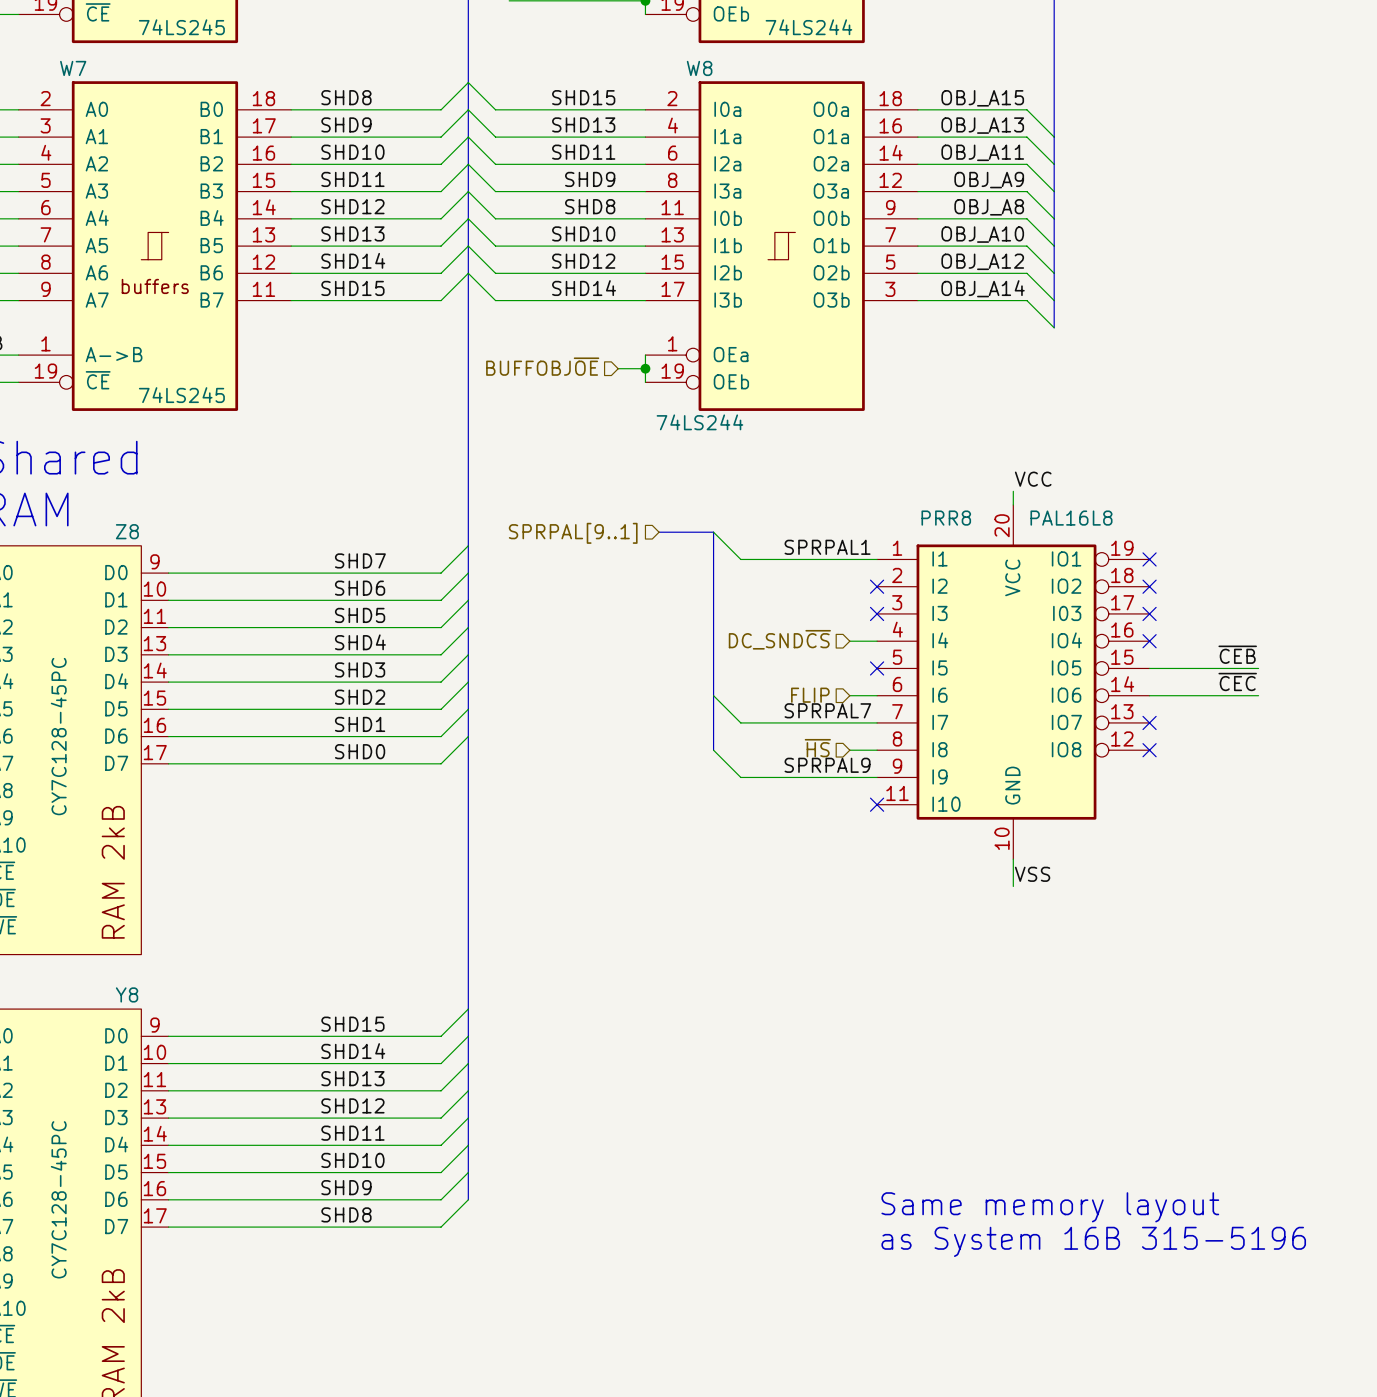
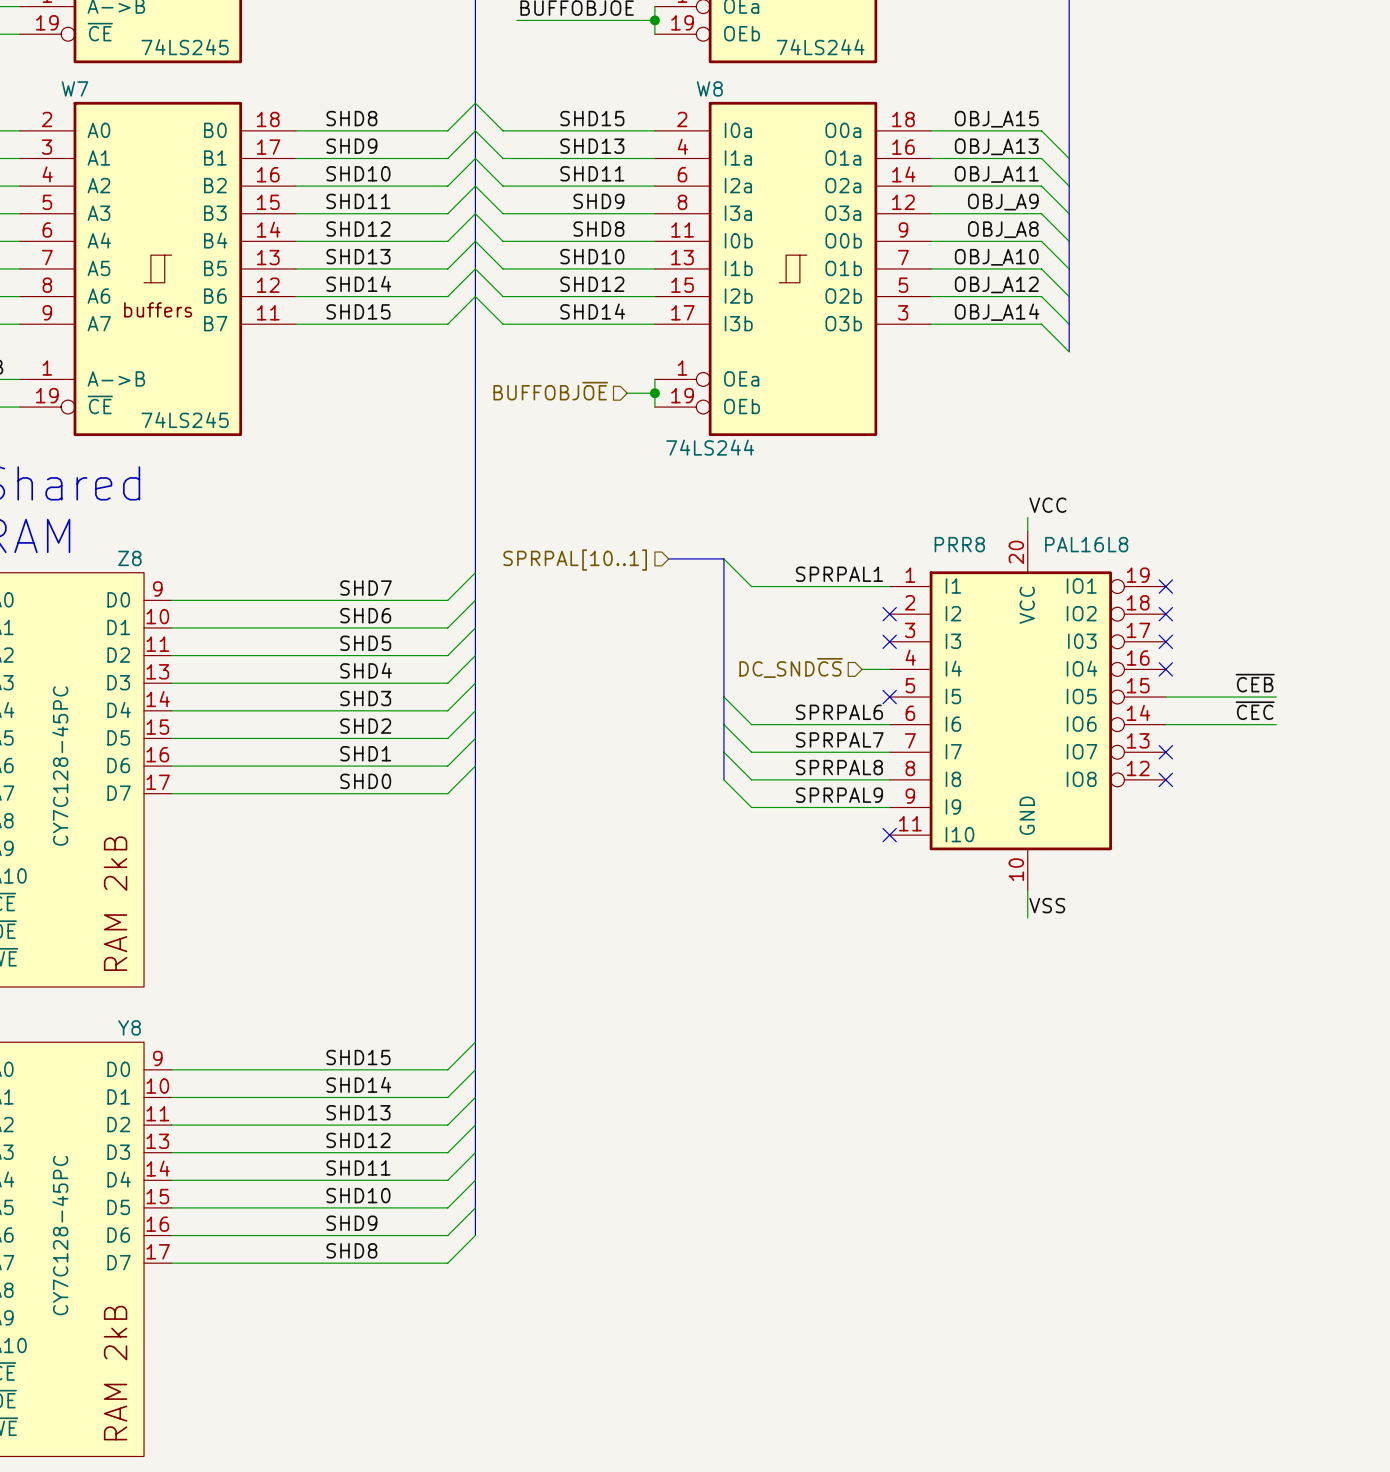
hierarchical label: SPRPAL[9..1] (573, 533) -> SPRPAL[10..1] (575, 560)
wire: none -> (723, 697) (751, 724) (862, 724)
label: none -> SPRPAL6 (839, 712)
hierarchical label: FLIP (810, 695) -> none
wire: none -> (723, 752) (751, 779) (862, 779)
label: none -> SPRPAL8 (839, 767)
hierarchical label: ~{HS} (817, 748) -> none
text: Same memory layout (1050, 1207) -> none
text: as System 16B 315-5196 (1093, 1241) -> none

